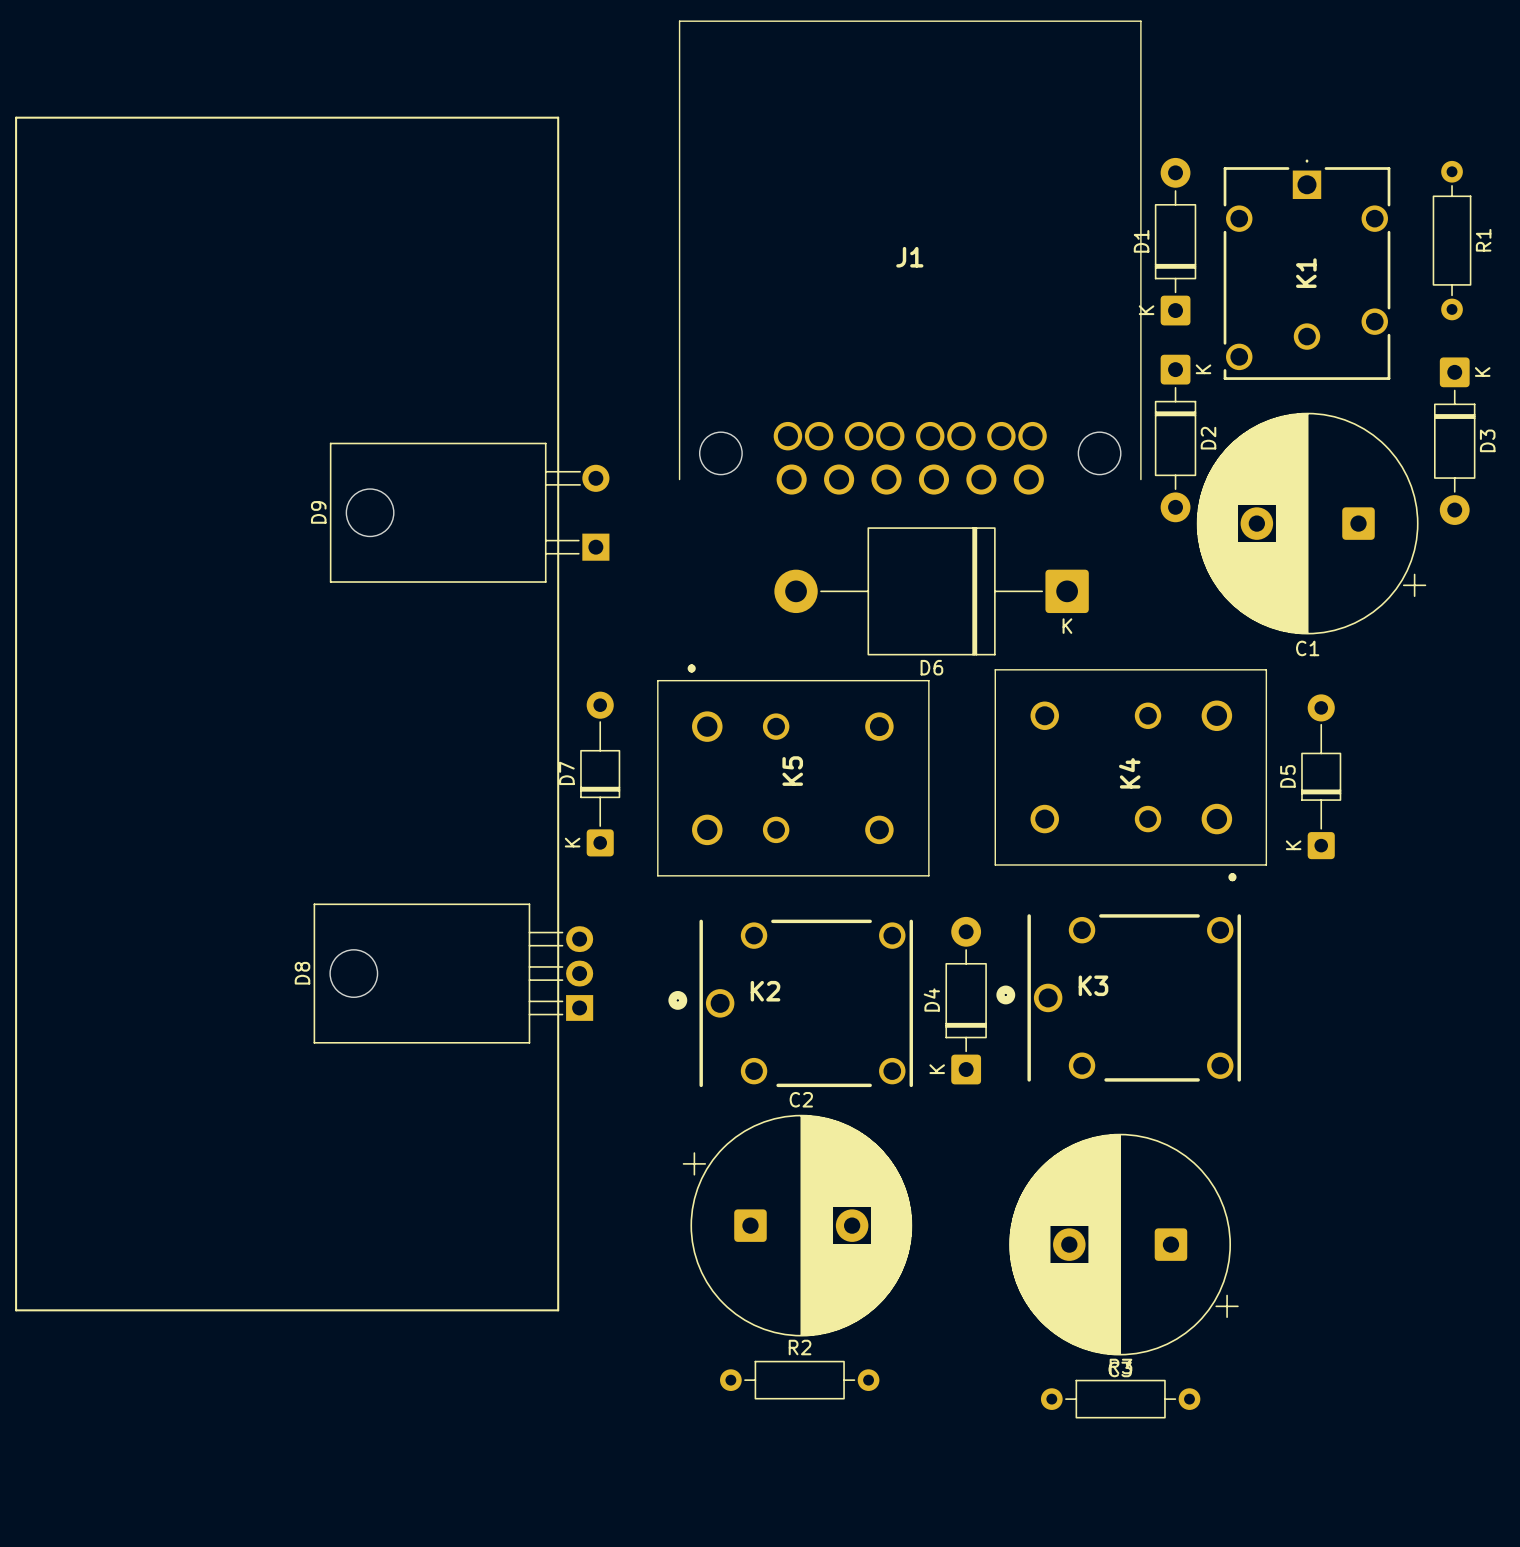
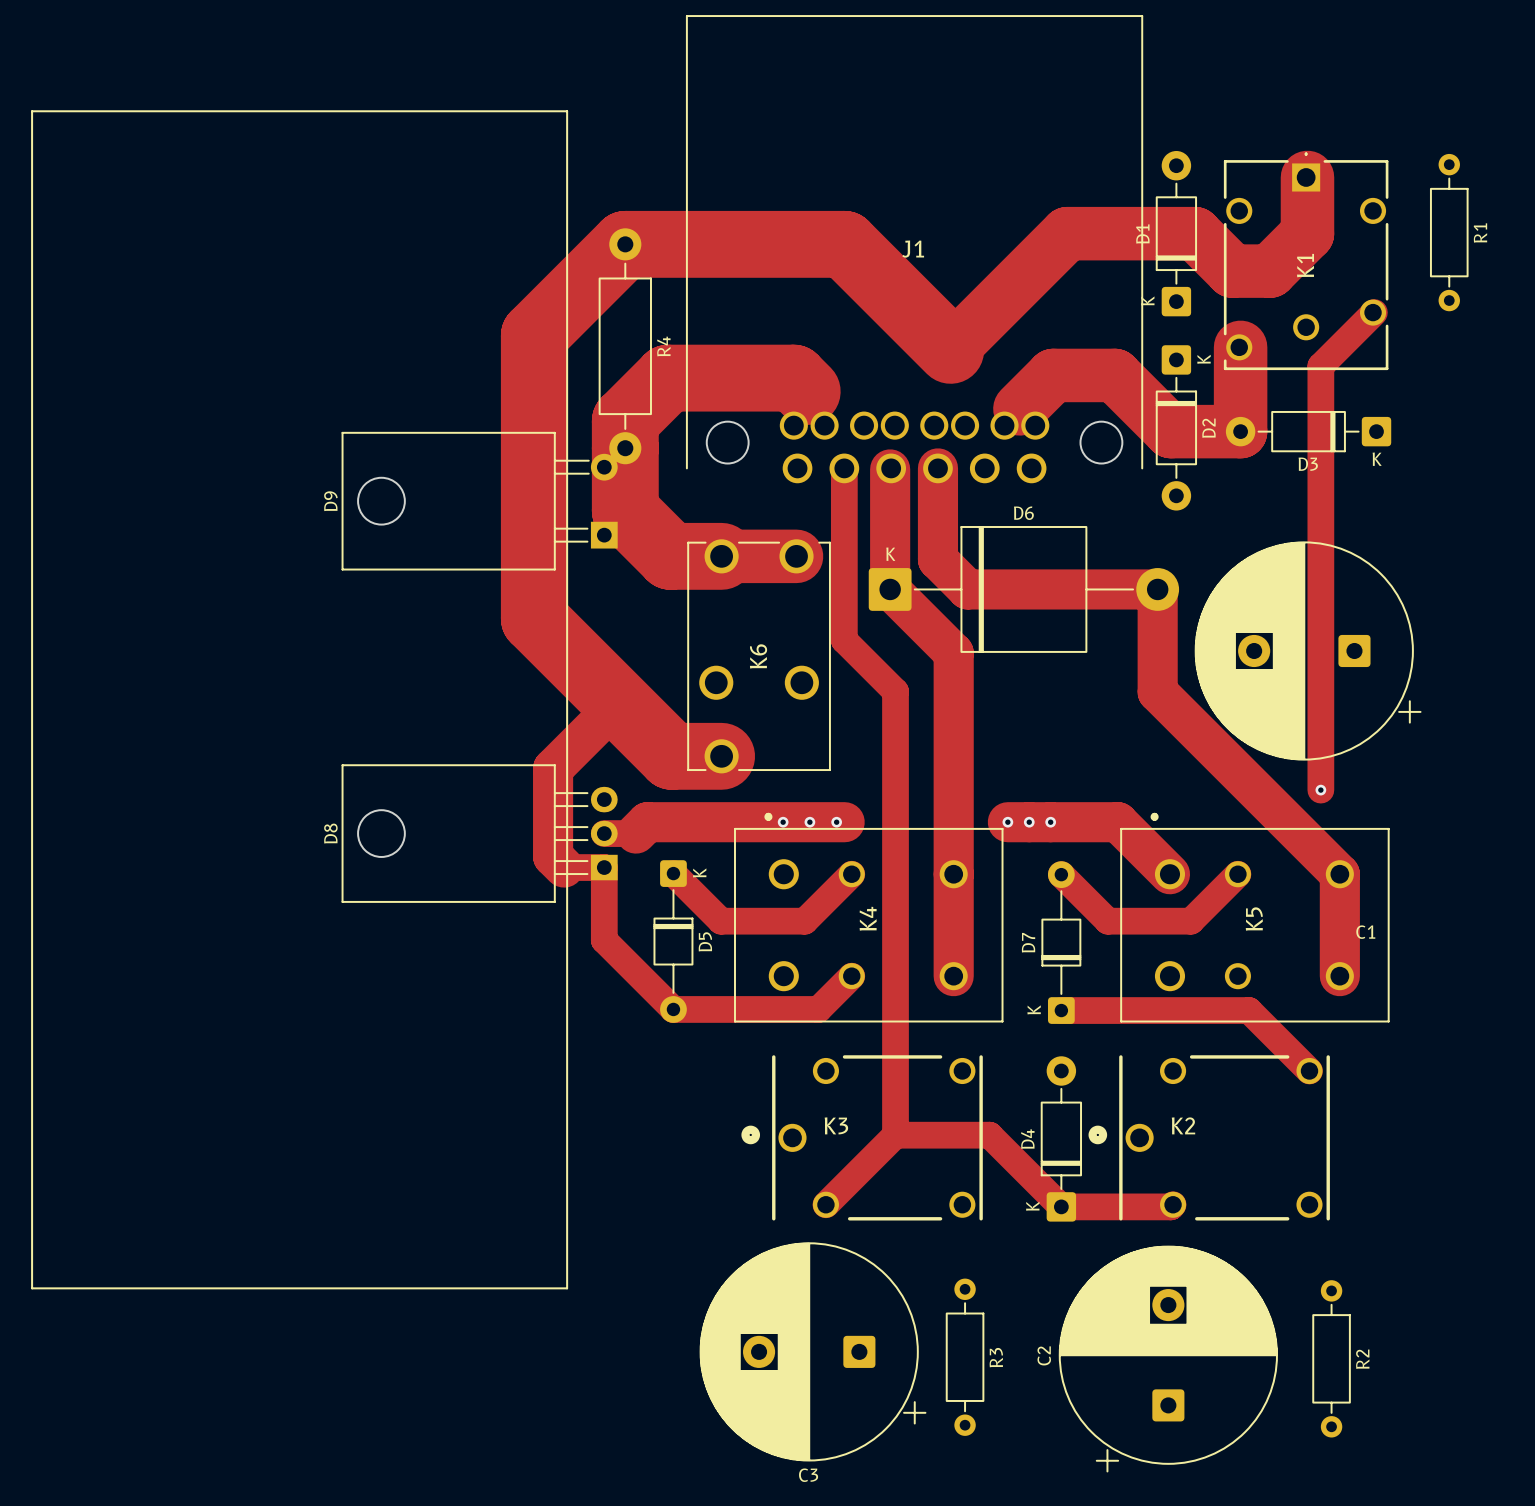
track: none -> (1307, 177) (1307, 233) (1270, 271) (1232, 271) (1195, 233) (1067, 233) (950, 350) (844, 244) (625, 244) (534, 335) (534, 618) (671, 756) (721, 756)
track: none -> (1374, 312) (1320, 366) (1320, 790)
R4: none -> (625, 346)
track: none -> (1240, 347) (1240, 431) (1171, 431) (1114, 375) (1053, 375) (1019, 408)
track: none -> (807, 391) (793, 378) (668, 378) (625, 420) (625, 511) (670, 556) (796, 556)
D3 rotation: 0° (1454, 441) -> 90° clockwise (1308, 431)
D3 position: (1454, 441) -> (1308, 431)
track: none -> (844, 468) (844, 640) (895, 691) (895, 1135)
track: none -> (891, 468) (890, 589)
track: none -> (937, 468) (937, 559) (967, 589) (1157, 589) (1157, 692) (1339, 874) (1339, 976)
C1 position: (1311, 523) -> (1308, 650)
D6 rotation: 0° (931, 591) -> 180° (1023, 589)
track: none -> (890, 589) (953, 652) (953, 976)
C1 name position: C1 (1307, 648) -> C1 (1365, 932)
K6: none -> (759, 656)
track: none -> (618, 703) (553, 768) (553, 856) (564, 867) (604, 867) (604, 940) (673, 1009) (818, 1009) (851, 976)
K5 position: (793, 770) -> (1254, 917)
D7 position: (600, 774) -> (1061, 942)
K4 rotation: 0° (1130, 775) -> 180° (868, 917)
K4 position: (1130, 775) -> (868, 917)
D5 rotation: 0° (1321, 776) -> 180° (673, 941)
D5 position: (1321, 776) -> (673, 941)
via: none -> (1320, 790)
via: none -> (783, 822)
via: none -> (809, 822)
via: none -> (836, 822)
track: none -> (844, 822) (647, 822) (636, 833) (604, 833)
track: none -> (1007, 822) (1117, 822) (1169, 874)
via: none -> (1007, 822)
via: none -> (1029, 822)
via: none -> (1050, 822)
track: none -> (673, 873) (721, 921) (804, 921) (851, 874)
track: none -> (1237, 874) (1190, 921) (1107, 921) (1061, 874)
D8 position: (453, 973) -> (479, 833)
K3 position: (1118, 997) -> (862, 1137)
D4 position: (966, 1000) -> (1061, 1138)
K2 position: (790, 1003) -> (1209, 1137)
track: none -> (1061, 1010) (1249, 1010) (1309, 1071)
track: none -> (895, 1135) (989, 1135) (1061, 1206) (1170, 1206) (1173, 1204)
track: none -> (895, 1135) (825, 1204)
C2 rotation: 0° (797, 1225) -> 90° counterclockwise (1168, 1359)
C2 position: (797, 1225) -> (1168, 1359)
C3 position: (1124, 1244) -> (813, 1351)
R2 rotation: 0° (799, 1380) -> 90° clockwise (1331, 1358)
R2 position: (799, 1380) -> (1331, 1358)
R3 rotation: 0° (1120, 1399) -> 90° clockwise (965, 1357)
R3 position: (1120, 1399) -> (965, 1357)

